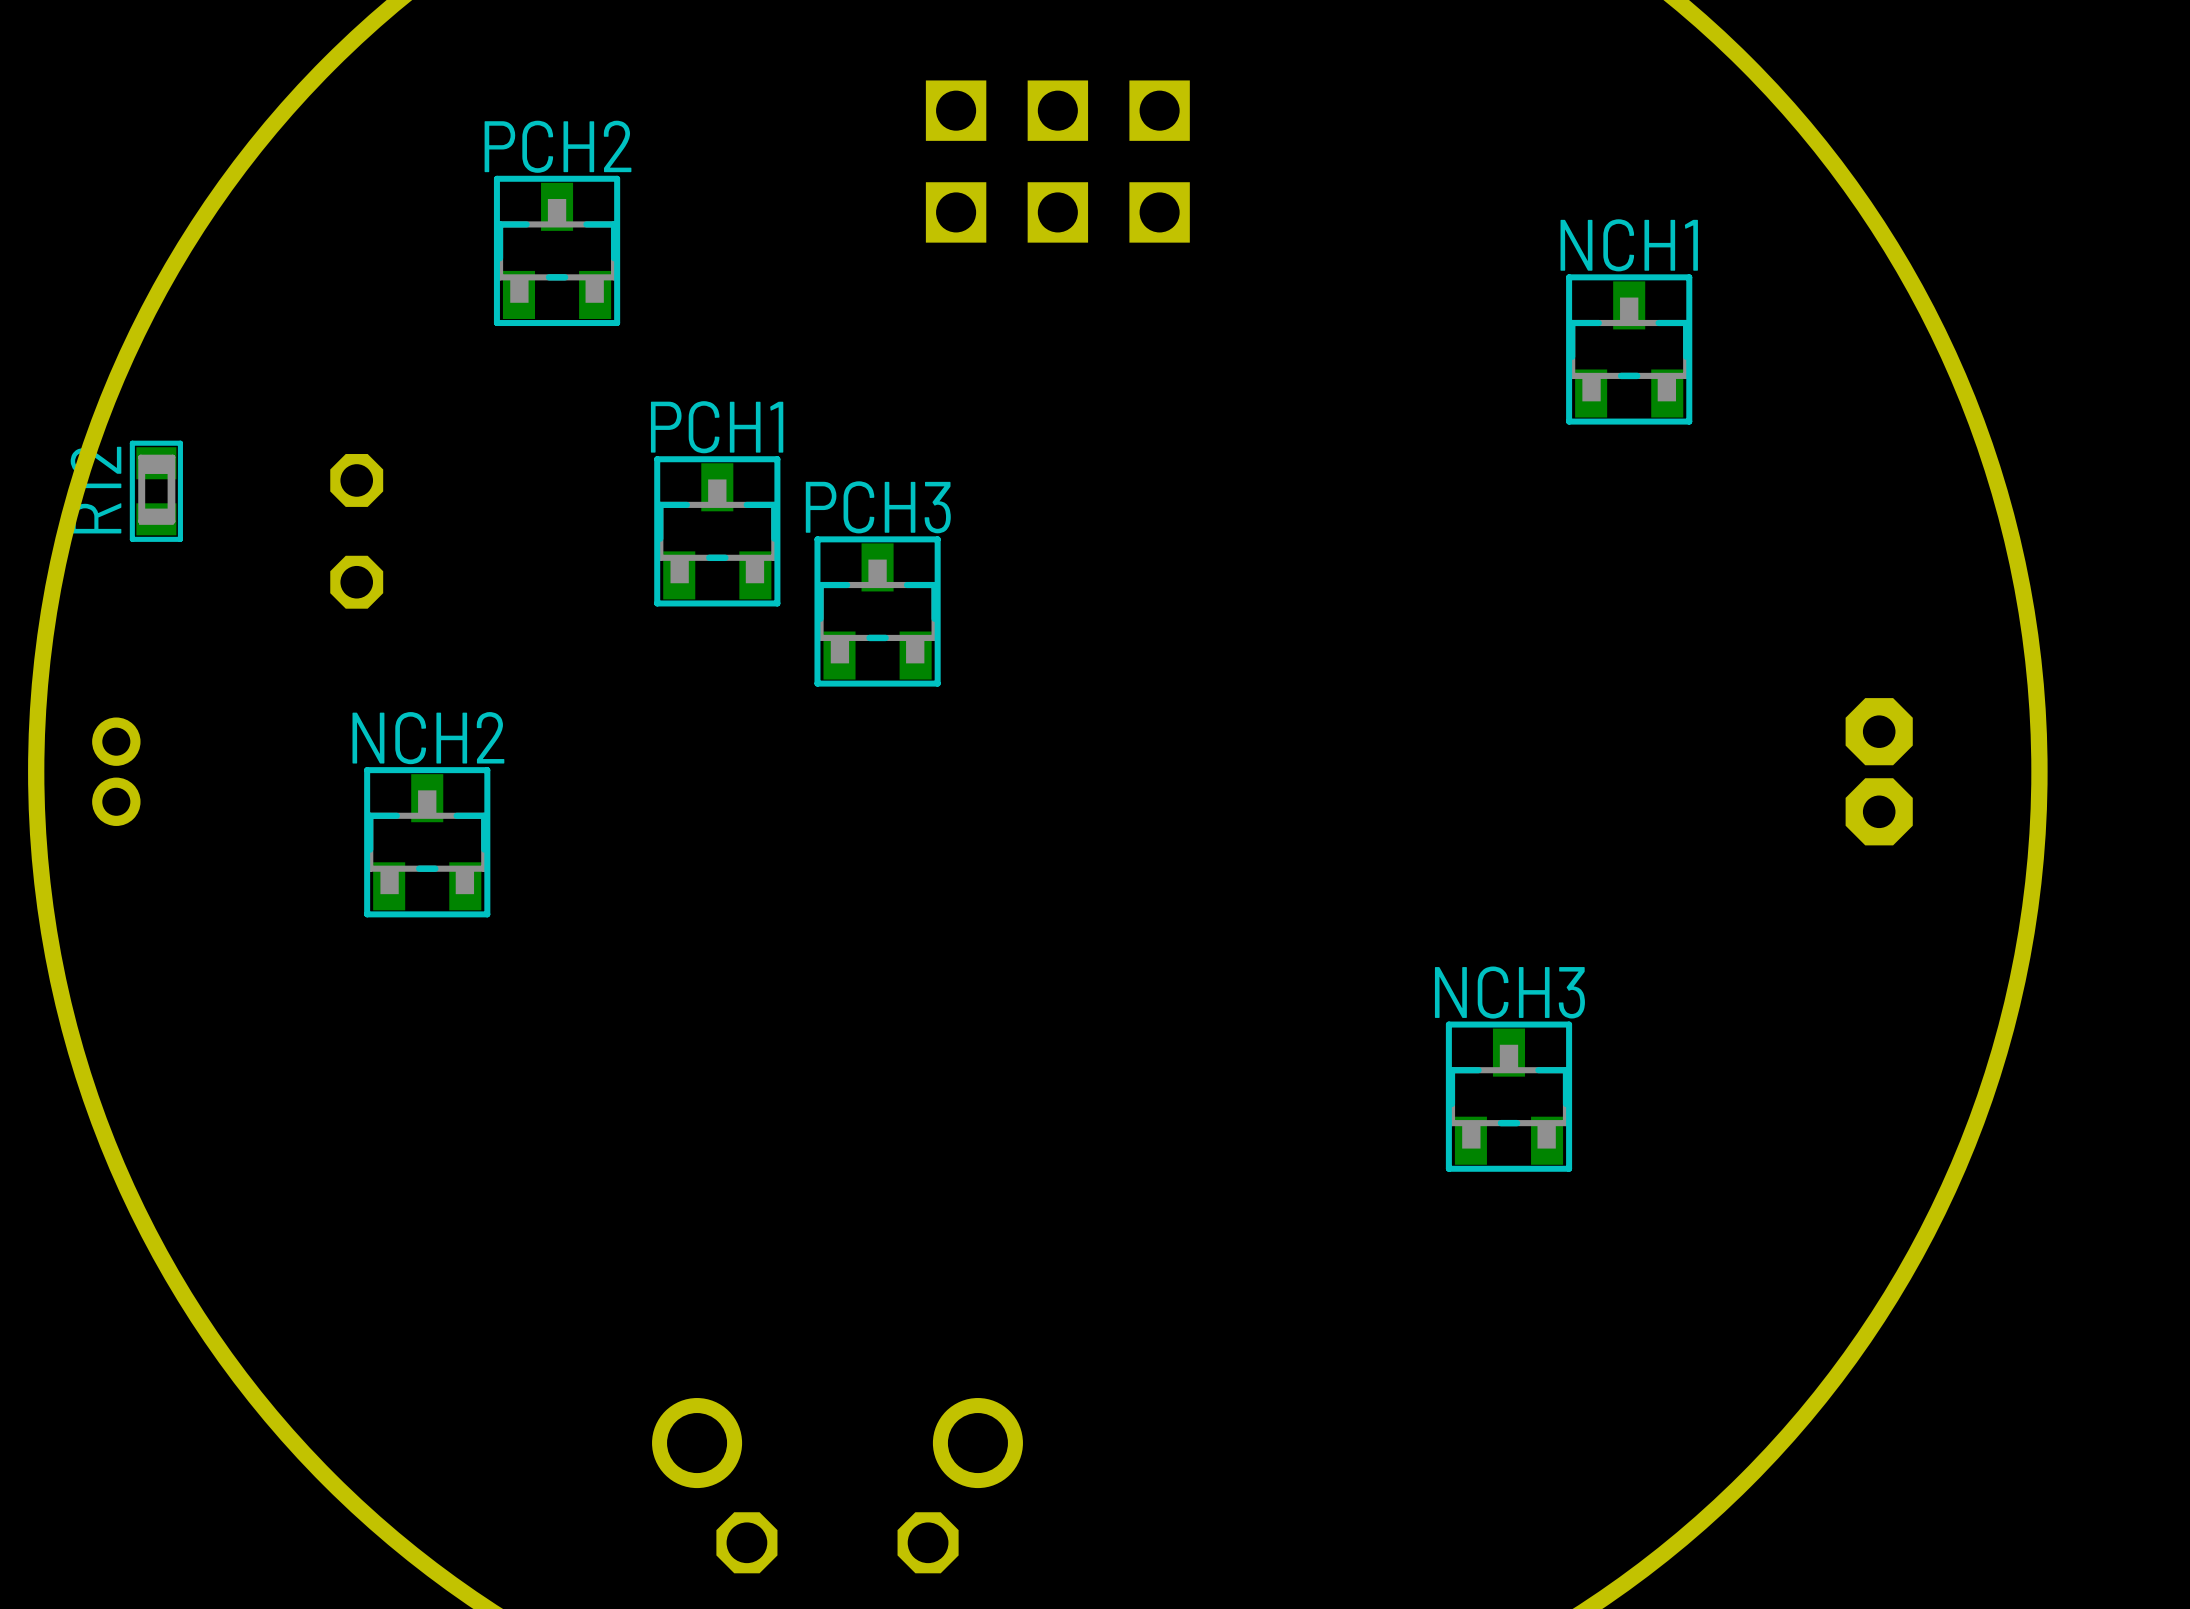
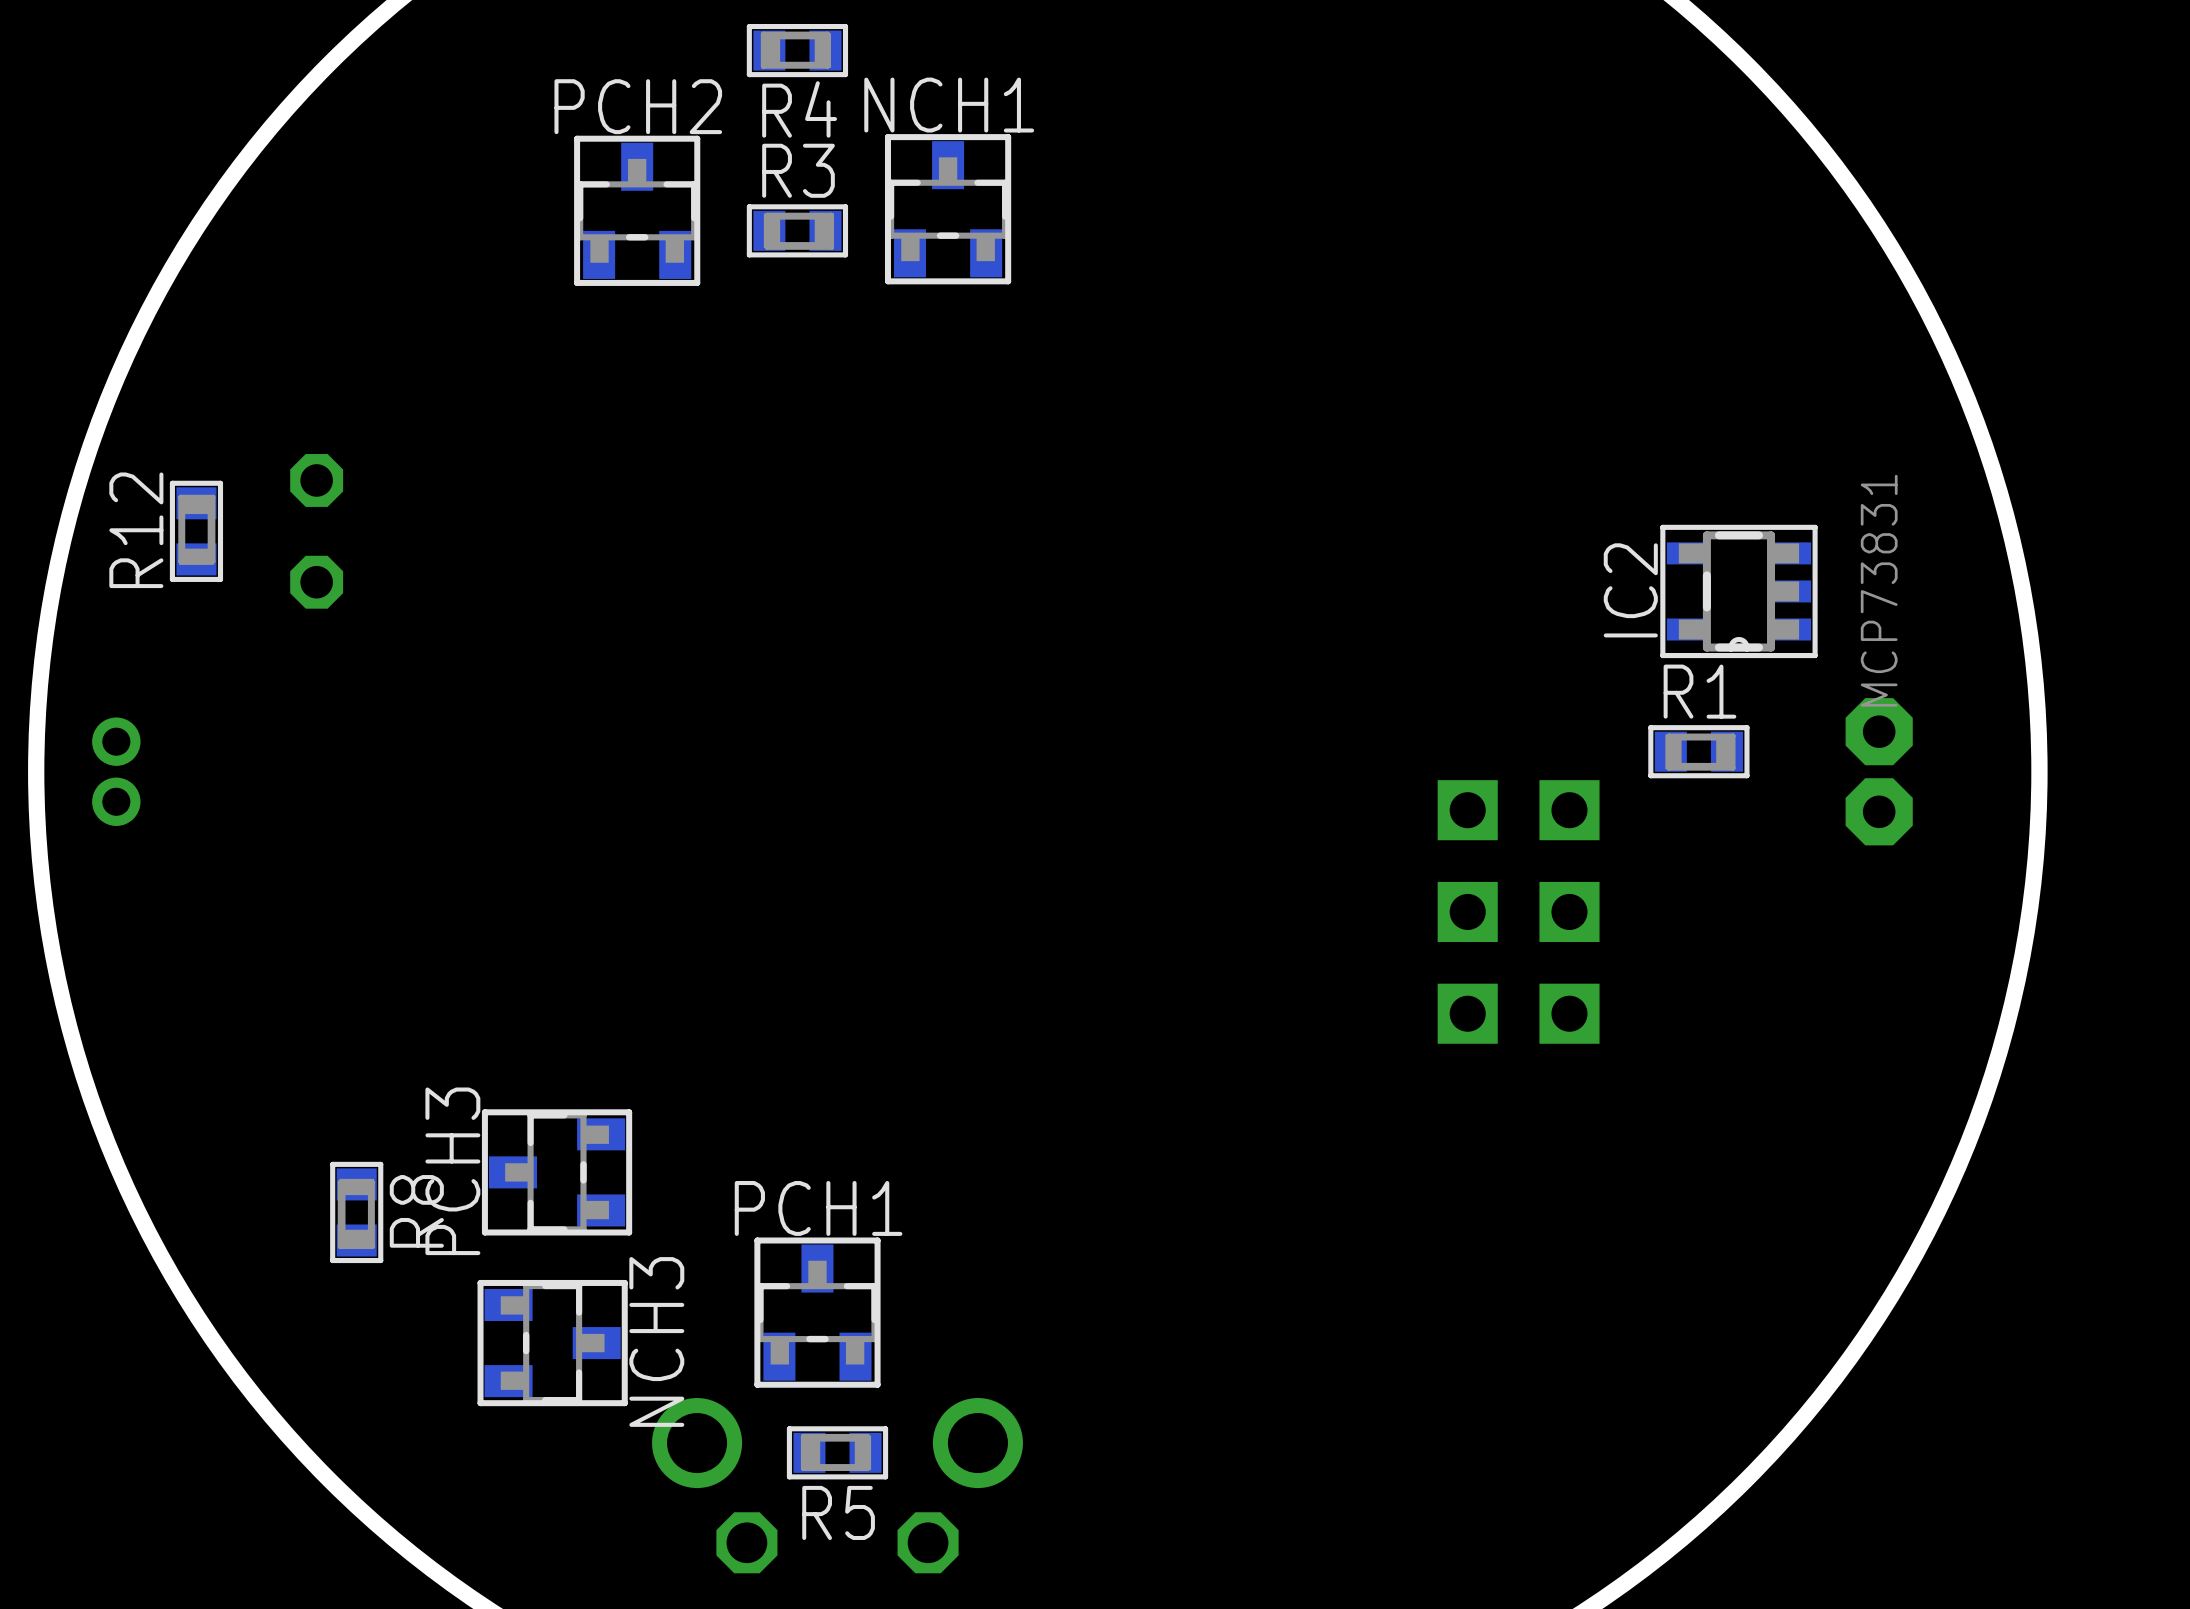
R4: none -> (797, 50)
part: (1057, 161) -> none
R3: none -> (797, 230)
PCH2 position: (557, 250) -> (637, 210)
NCH1 position: (1629, 349) -> (948, 209)
R12 position: (156, 491) -> (196, 531)
part position: (356, 531) -> (316, 531)
PCH1 position: (717, 531) -> (817, 1312)
IC2: none -> MCP73831 (1738, 591)
PCH3 rotation: 0° (877, 611) -> 90° counterclockwise (557, 1172)
PCH3 position: (877, 611) -> (557, 1172)
R1: none -> (1698, 751)
NCH2: (427, 842) -> none
part: none -> (1518, 911)
NCH3 rotation: 0° (1508, 1096) -> 90° clockwise (552, 1343)
NCH3 position: (1508, 1096) -> (552, 1343)
R8: none -> (356, 1212)
R5: none -> (837, 1452)

